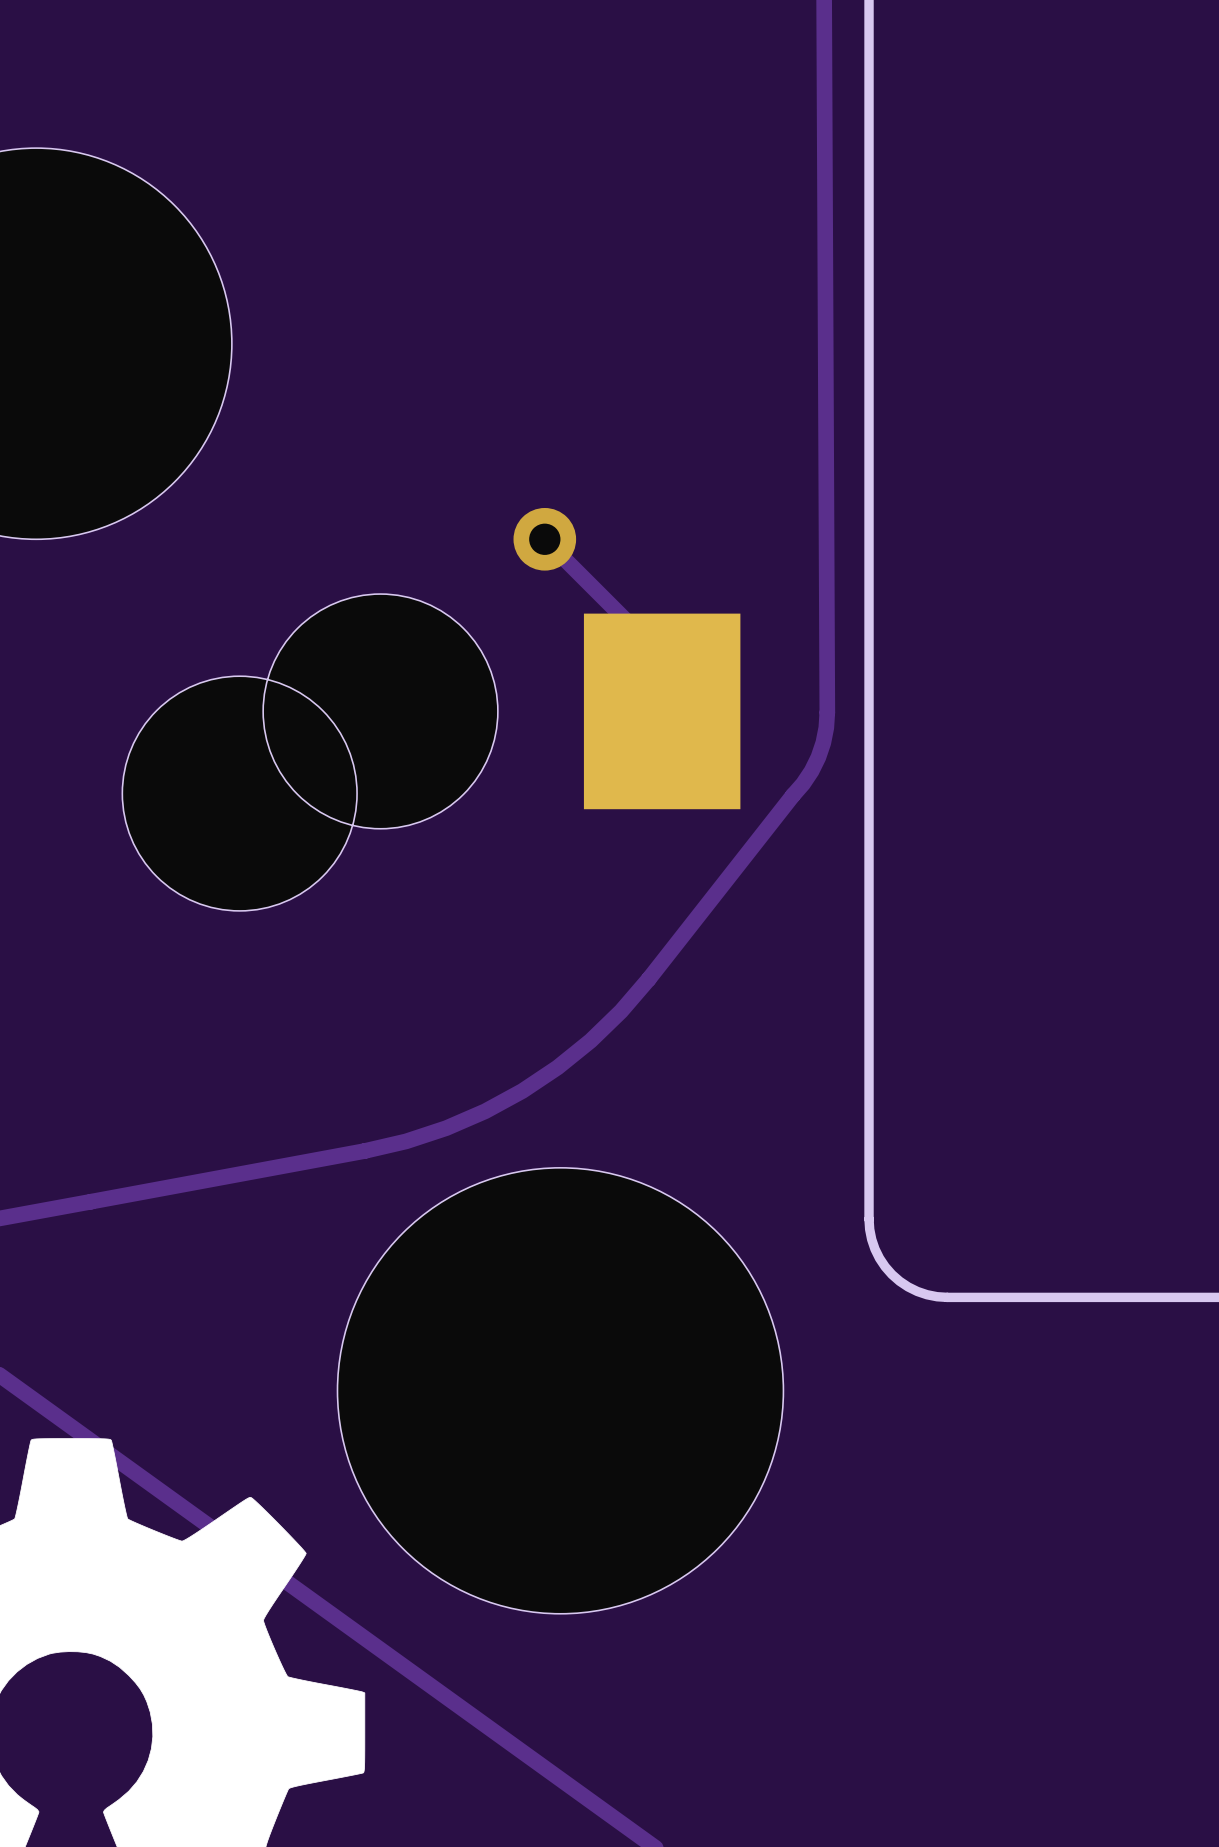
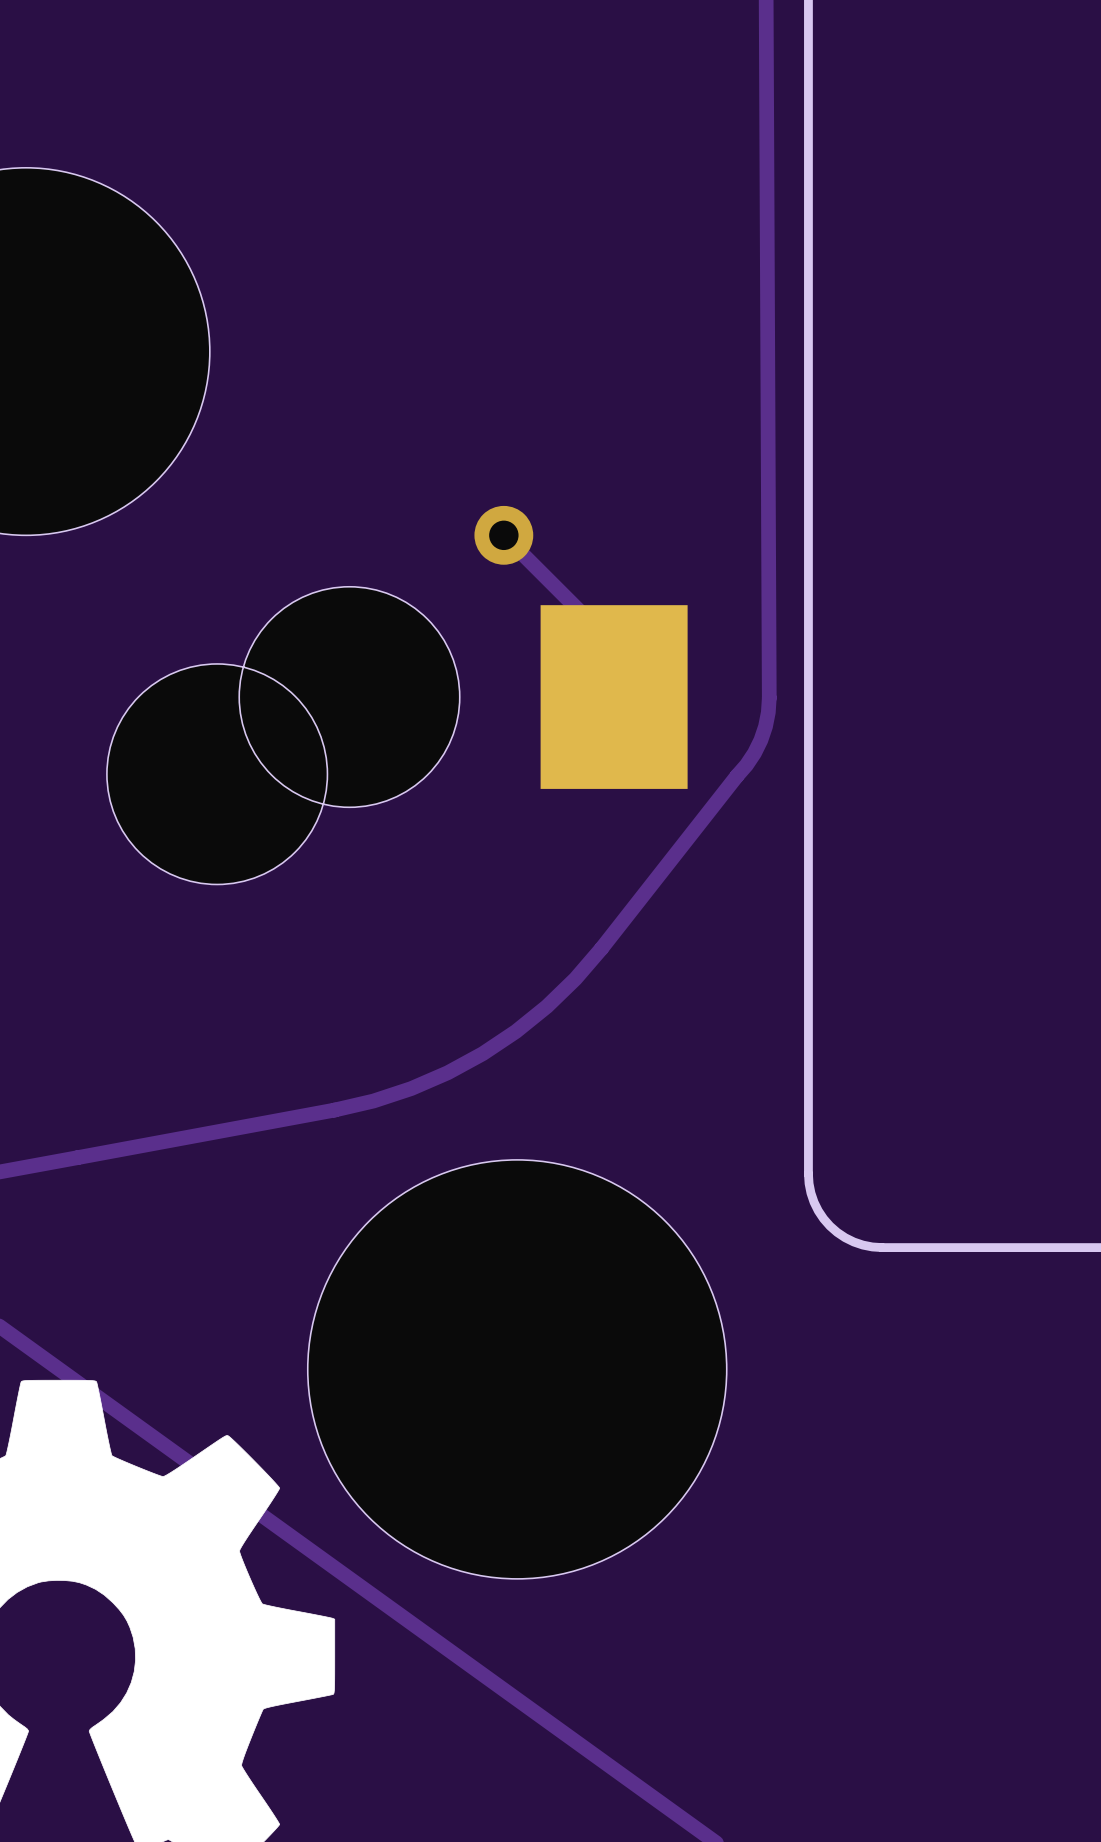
part position: (560, 1390) -> (517, 1369)

